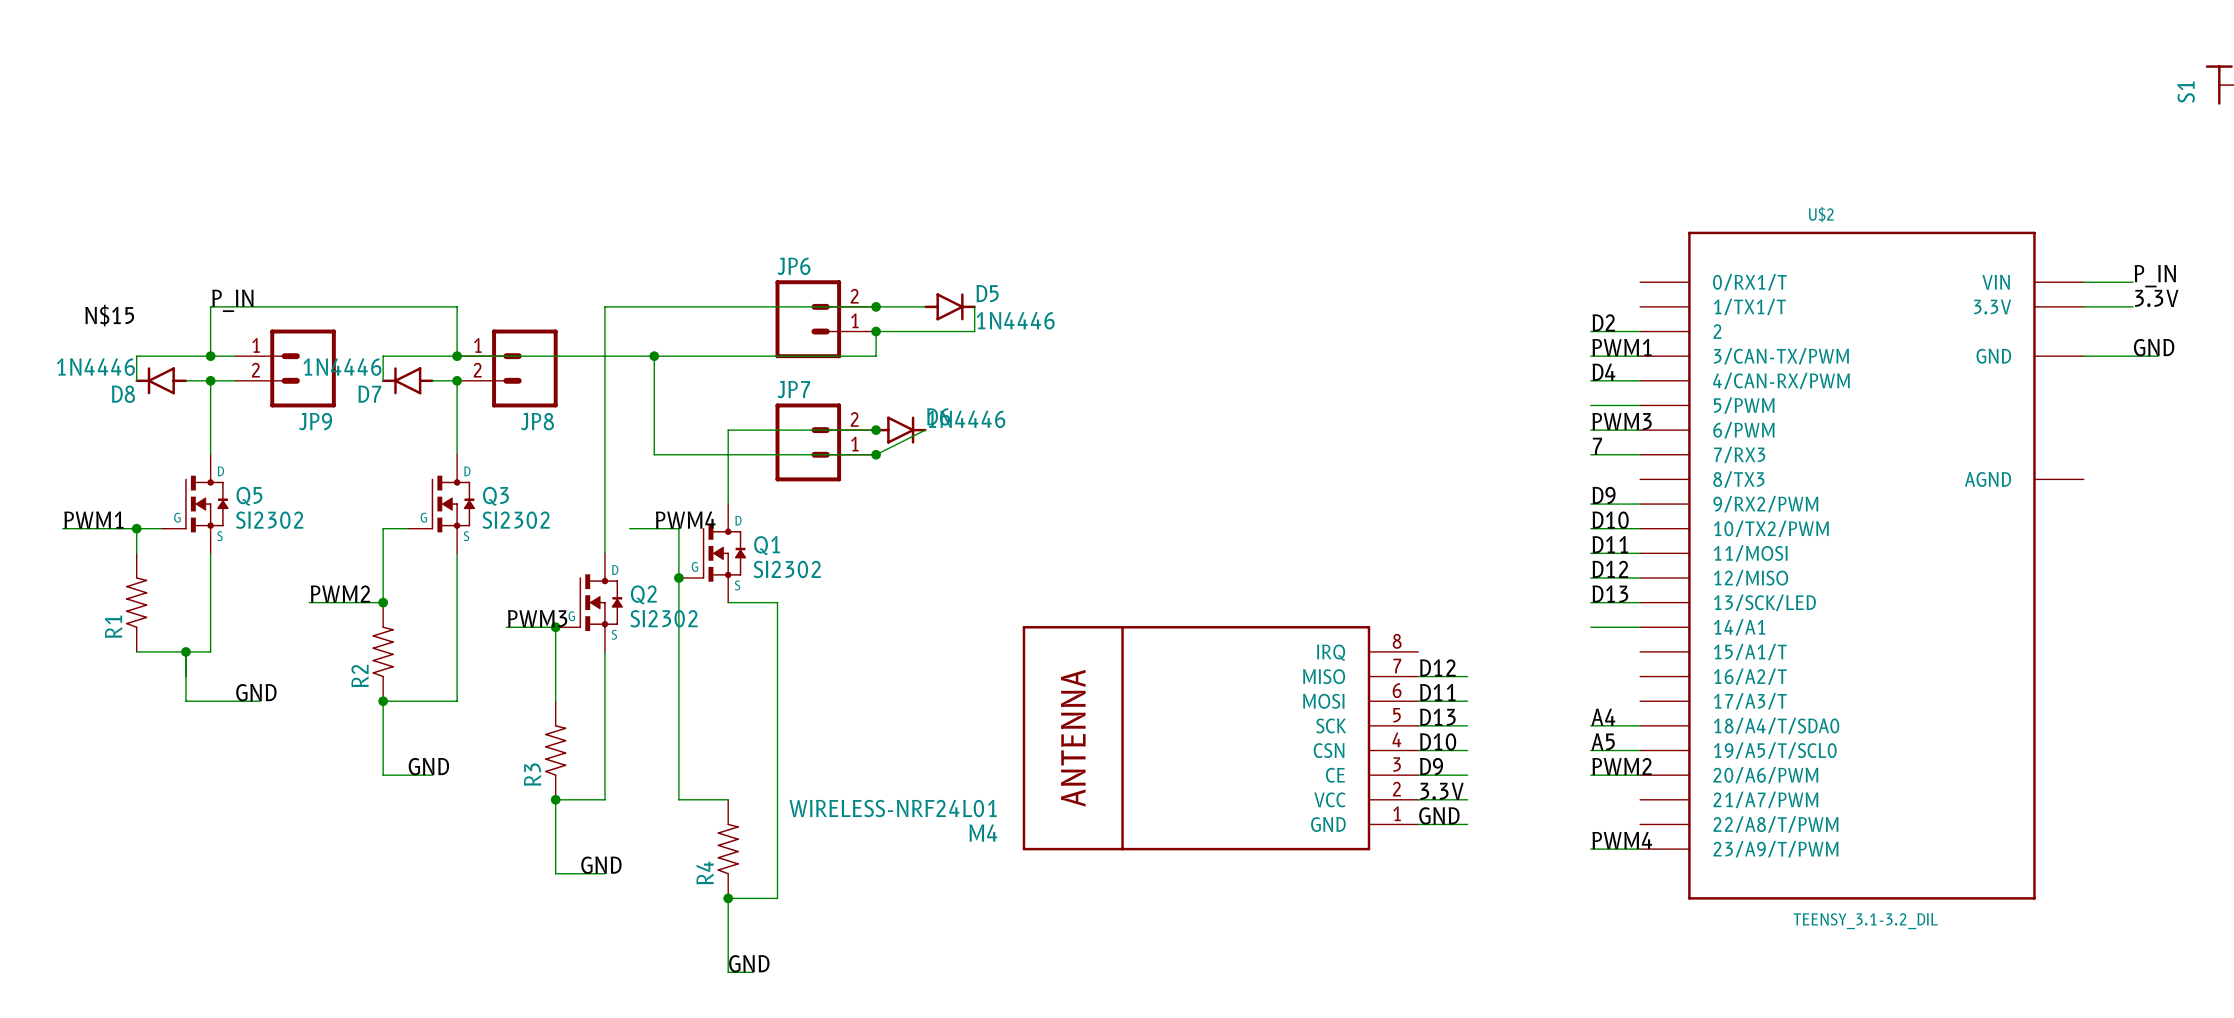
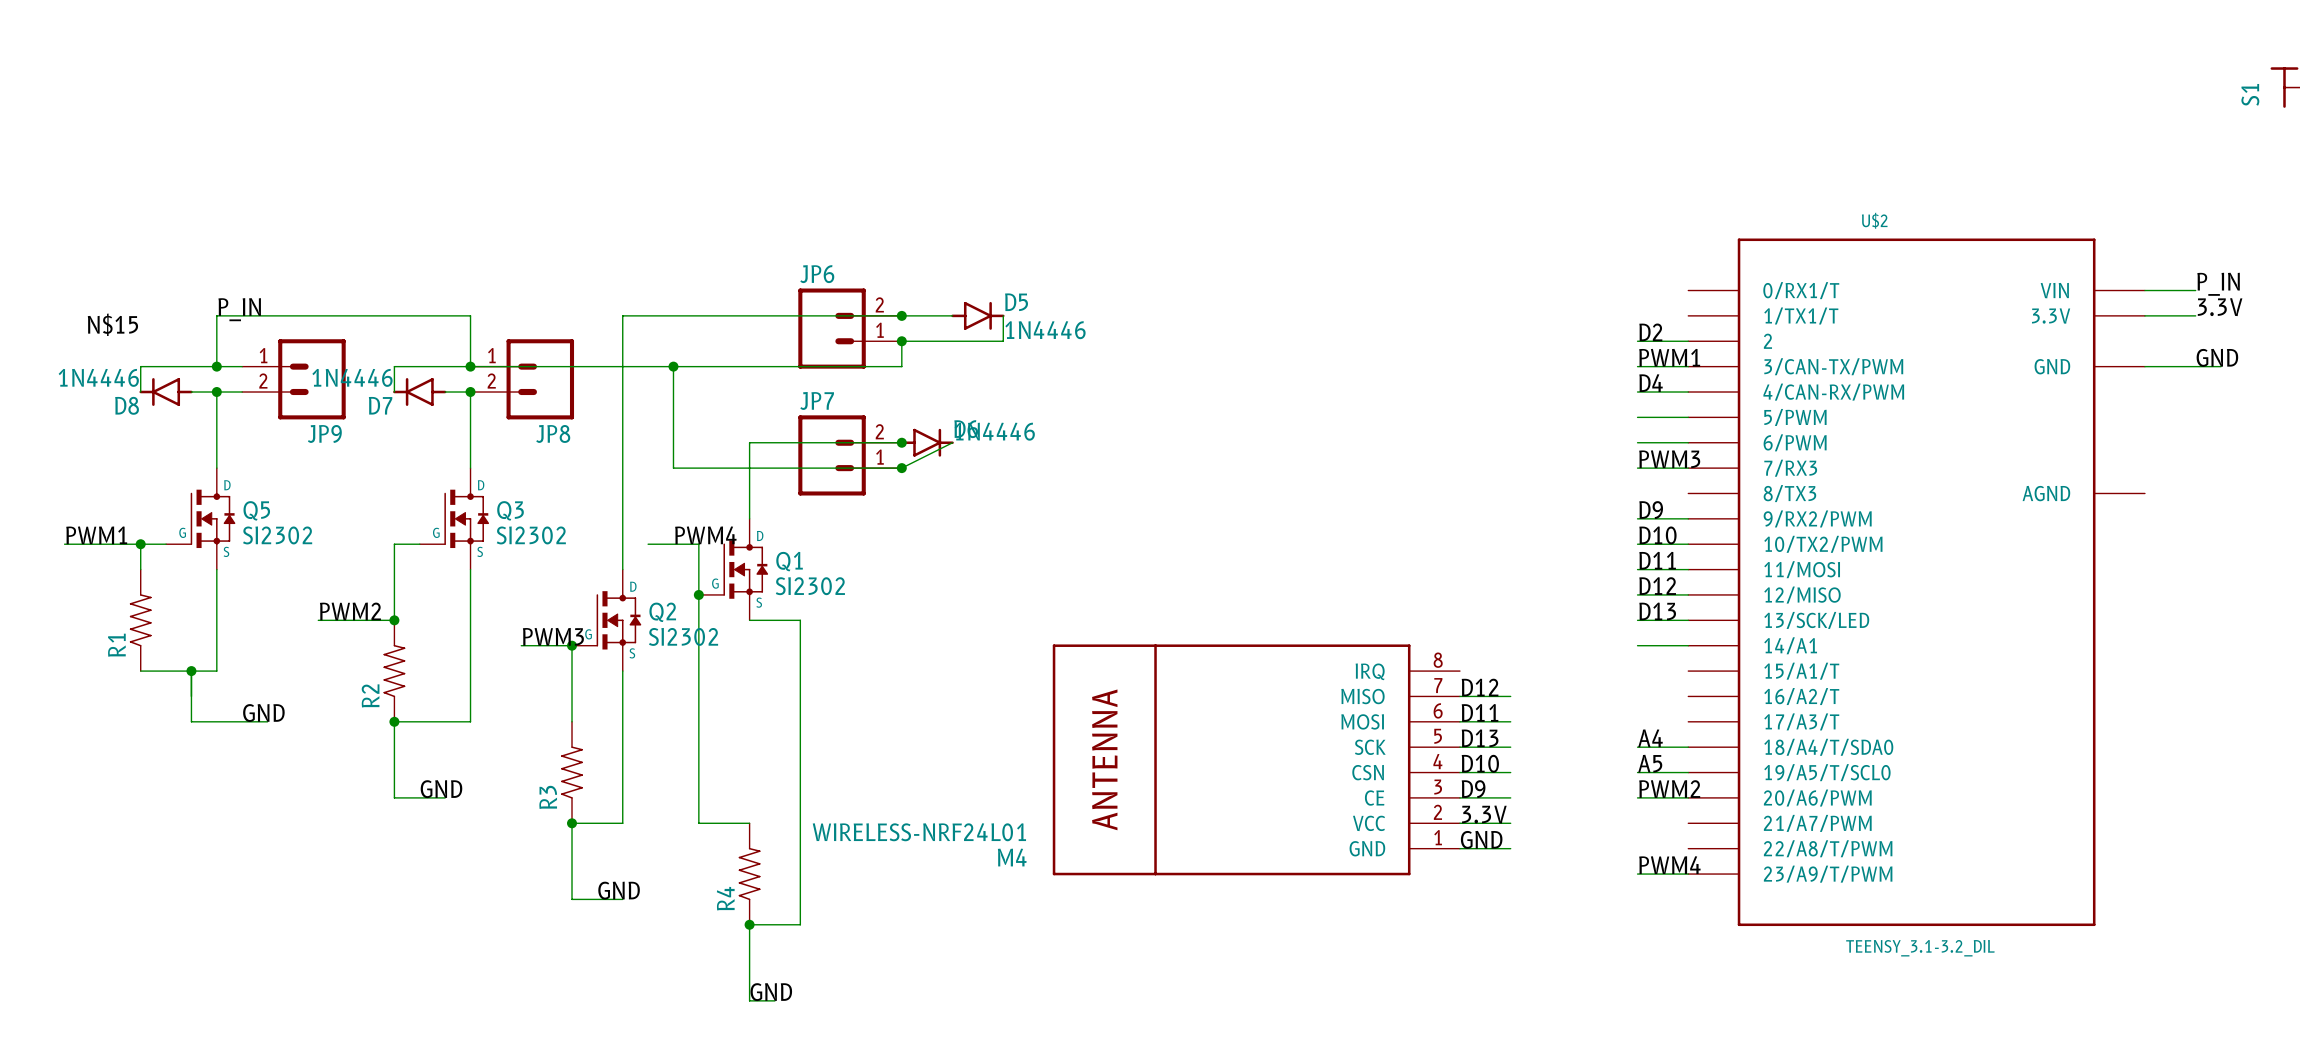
label: PWM3 (1622, 421) -> none
label: 7 (1597, 446) -> PWM3 (1669, 459)

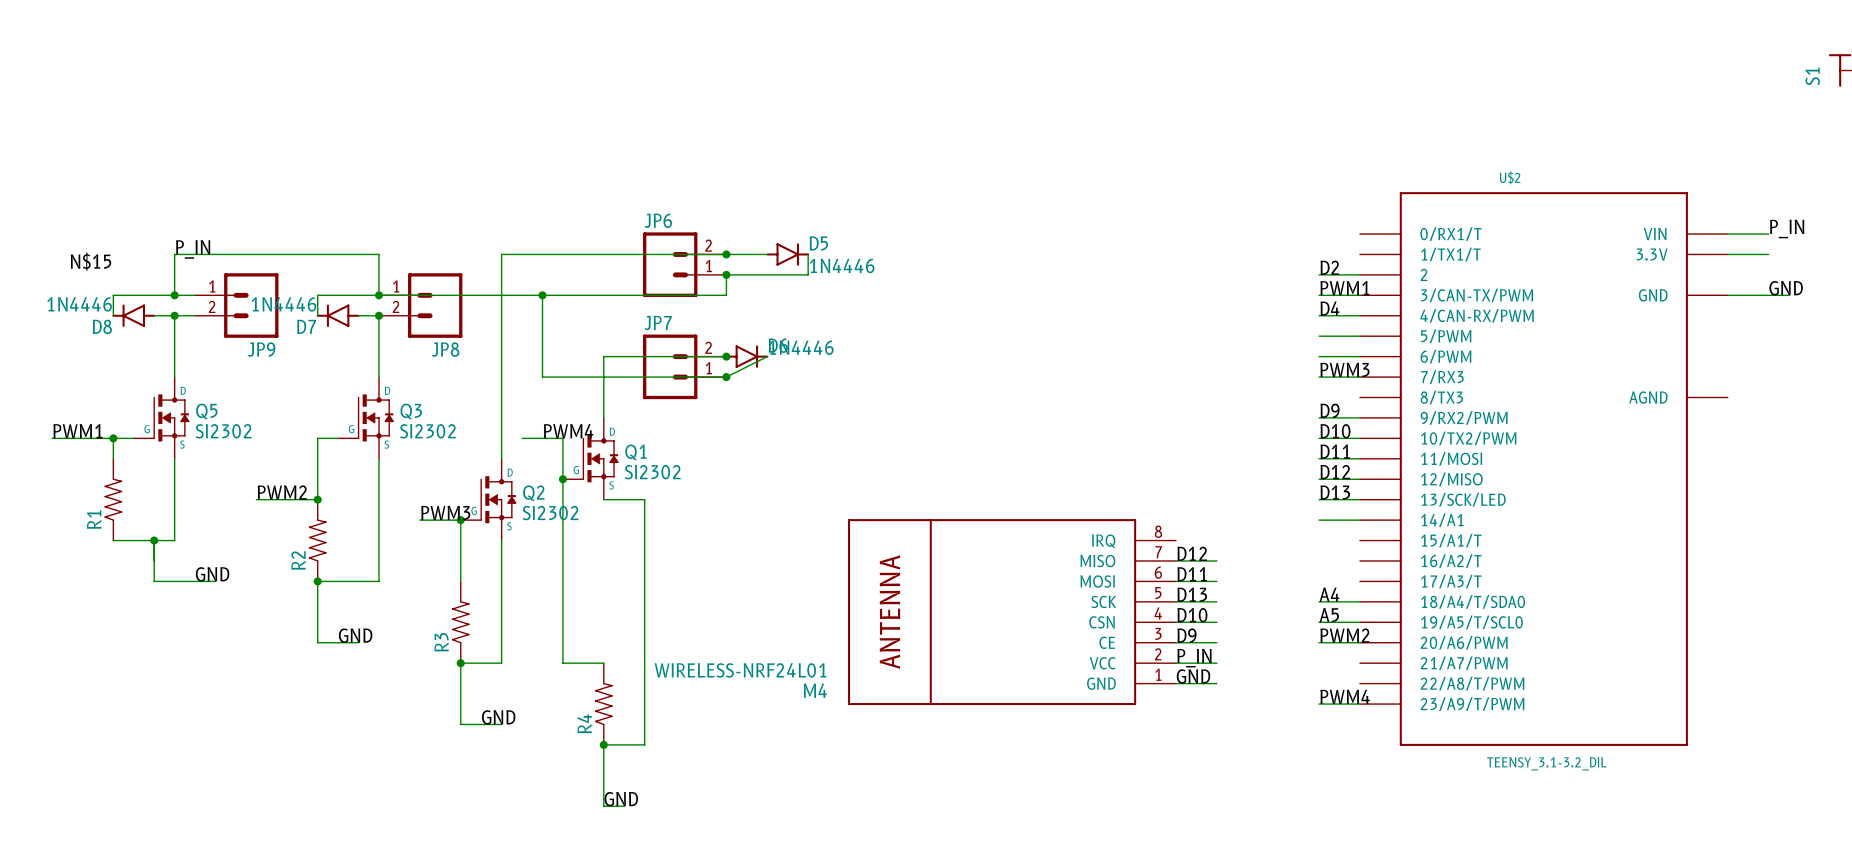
label: 3.3V (2220, 307) -> none
label: 3.3V (1484, 814) -> P_IN (1194, 658)

